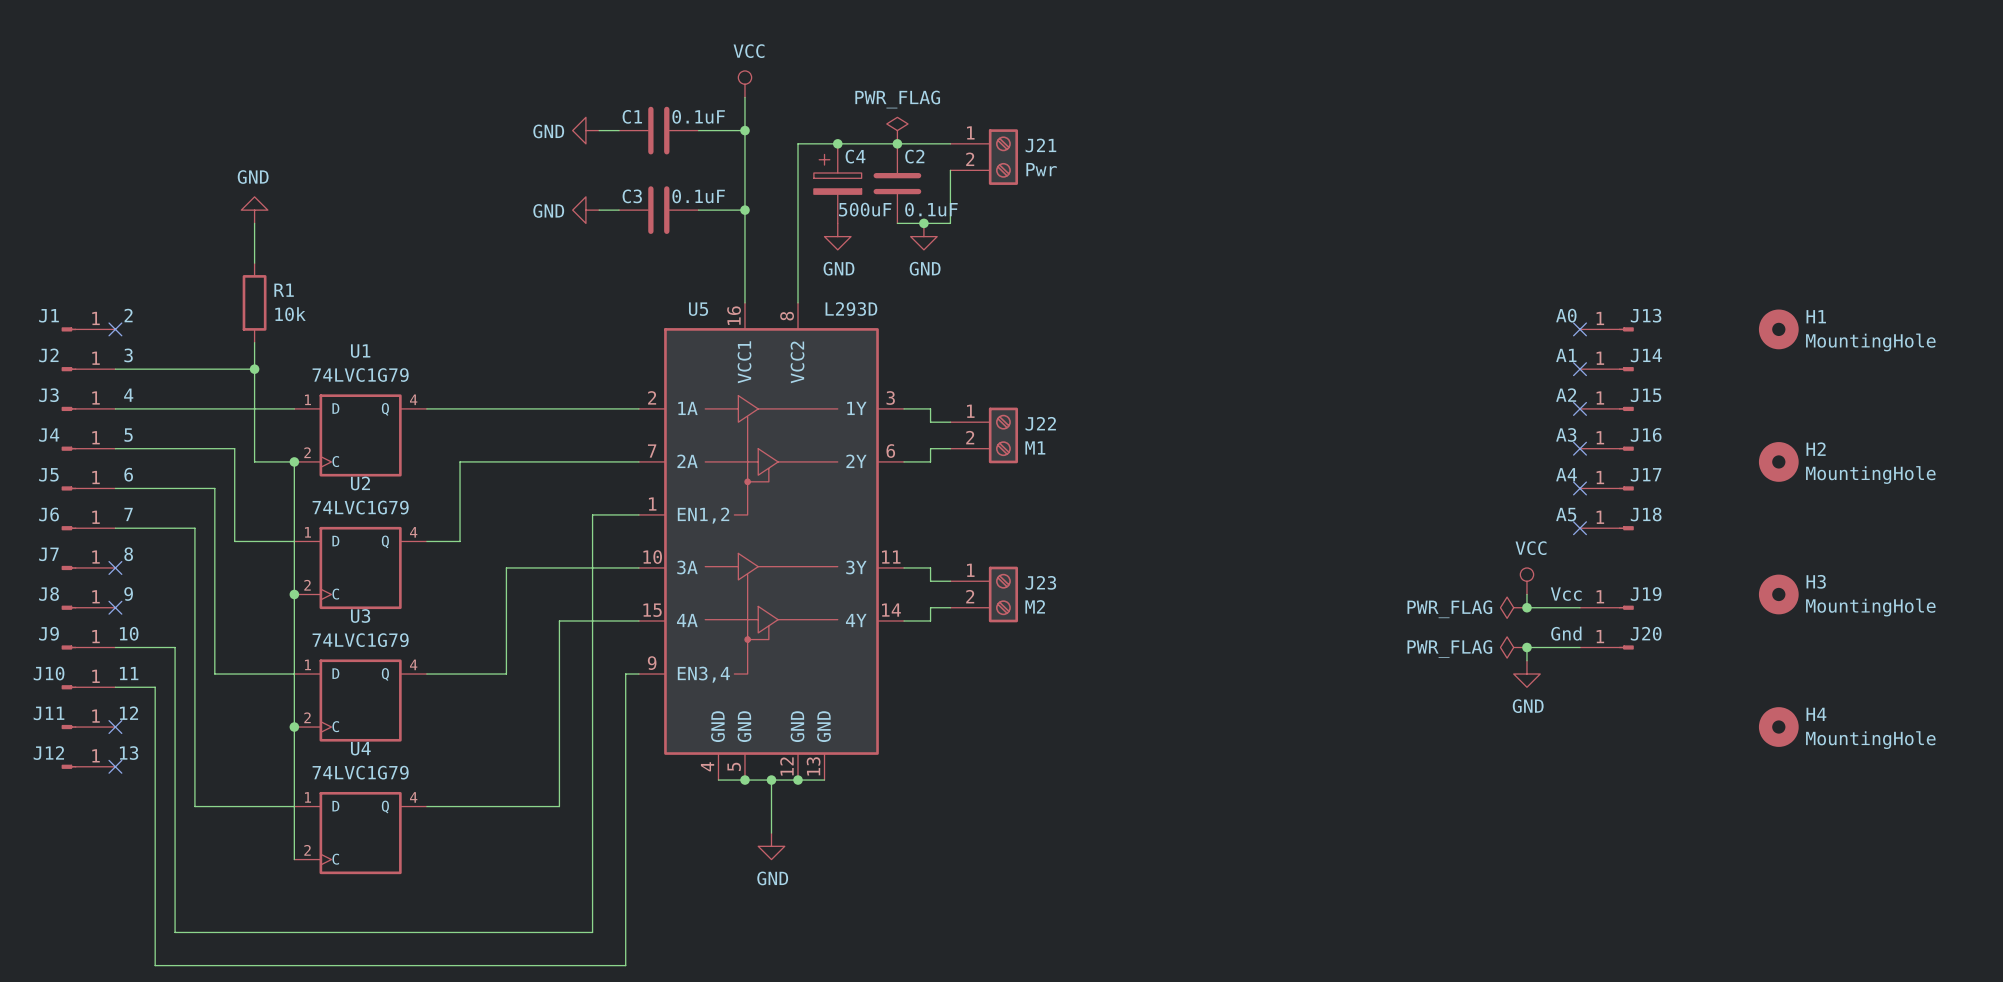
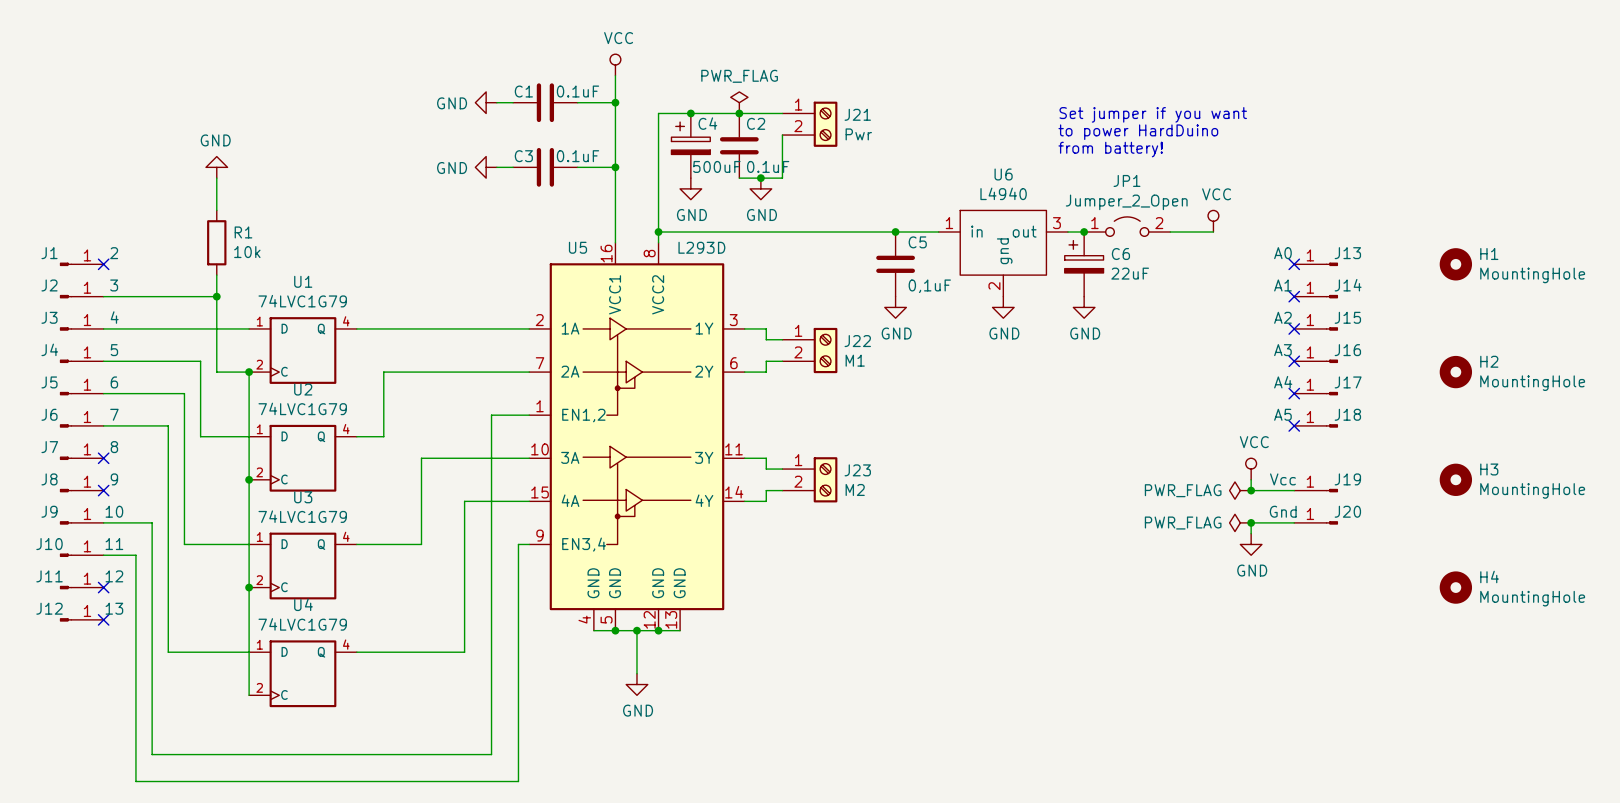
text: none -> Set jumper if you want (1153, 114)
text: none -> to power HardDuino (1138, 132)
text: none -> from battery! (1110, 149)
power symbol: none -> VCC (1213, 221)
JP1: none -> Jumper_2_Open (1127, 226)
wire: none -> (658, 232) (938, 232)
junction: none -> (658, 232)
junction: none -> (895, 232)
wire: none -> (1067, 232) (1084, 232)
junction: none -> (1084, 232)
wire: none -> (1170, 232) (1213, 232)
U6: none -> L4940 (1003, 253)
C5: none -> 0,1uF (895, 264)
C6: none -> 22uF (1084, 264)
power symbol: none -> GND (895, 307)
power symbol: none -> GND (1003, 307)
power symbol: none -> GND (1084, 307)

